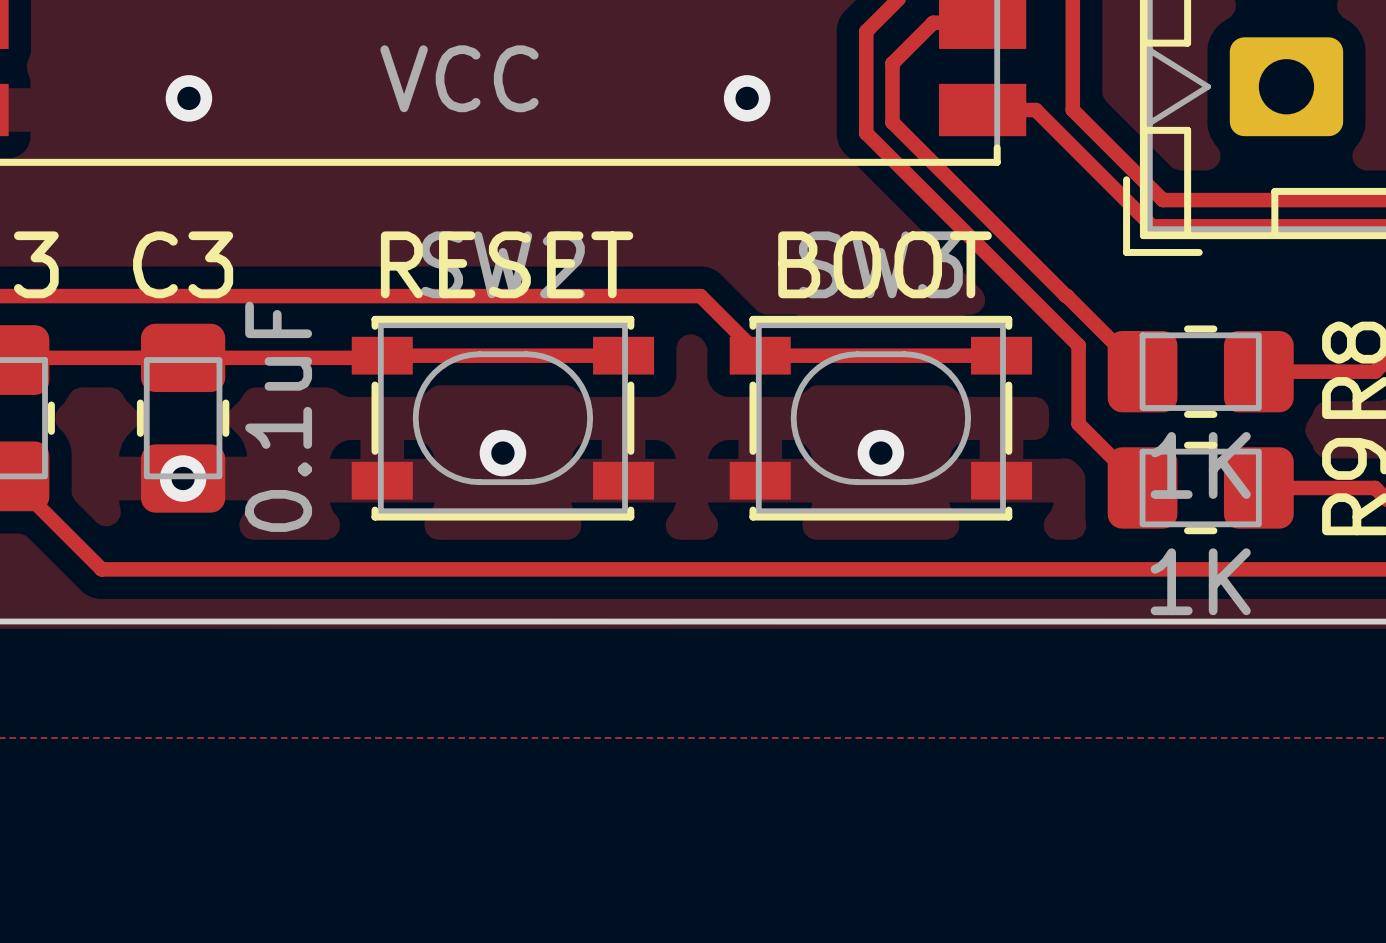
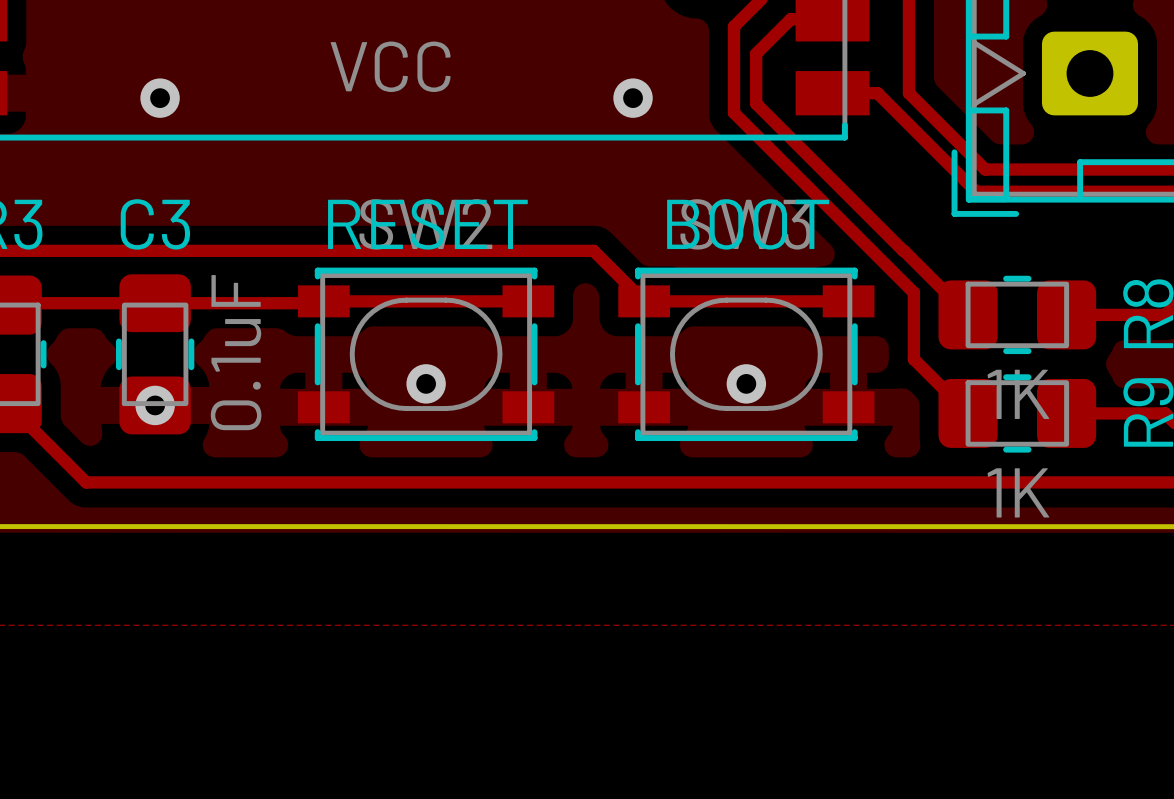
via position: (188, 98) -> (160, 98)
via position: (747, 98) -> (633, 98)

